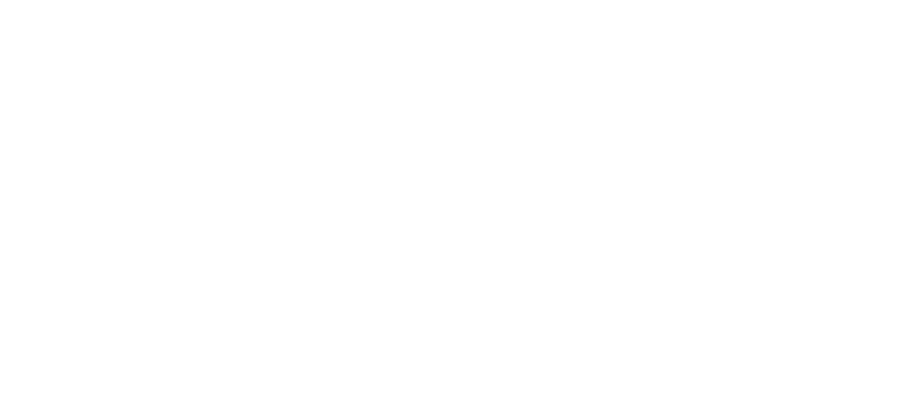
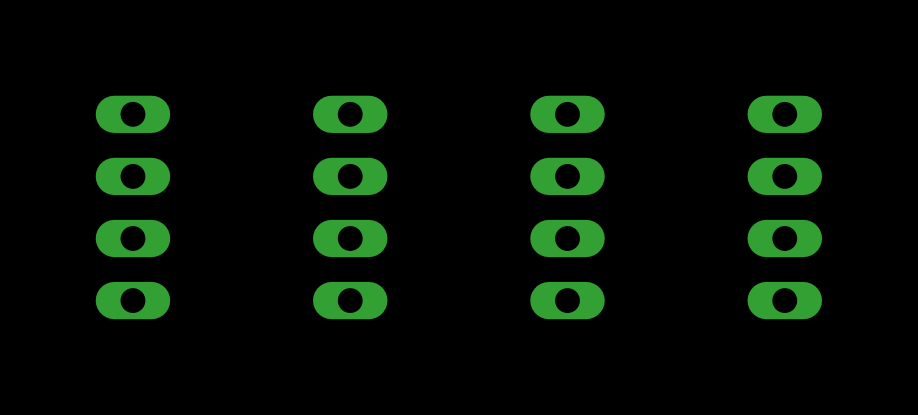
part: none -> (132, 207)
part: none -> (350, 207)
part: none -> (567, 207)
part: none -> (784, 207)

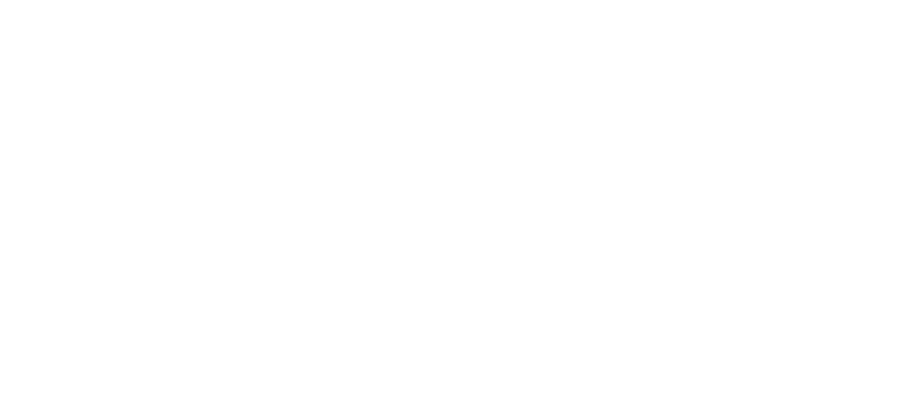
part: (132, 207) -> none
part: (350, 207) -> none
part: (567, 207) -> none
part: (784, 207) -> none

